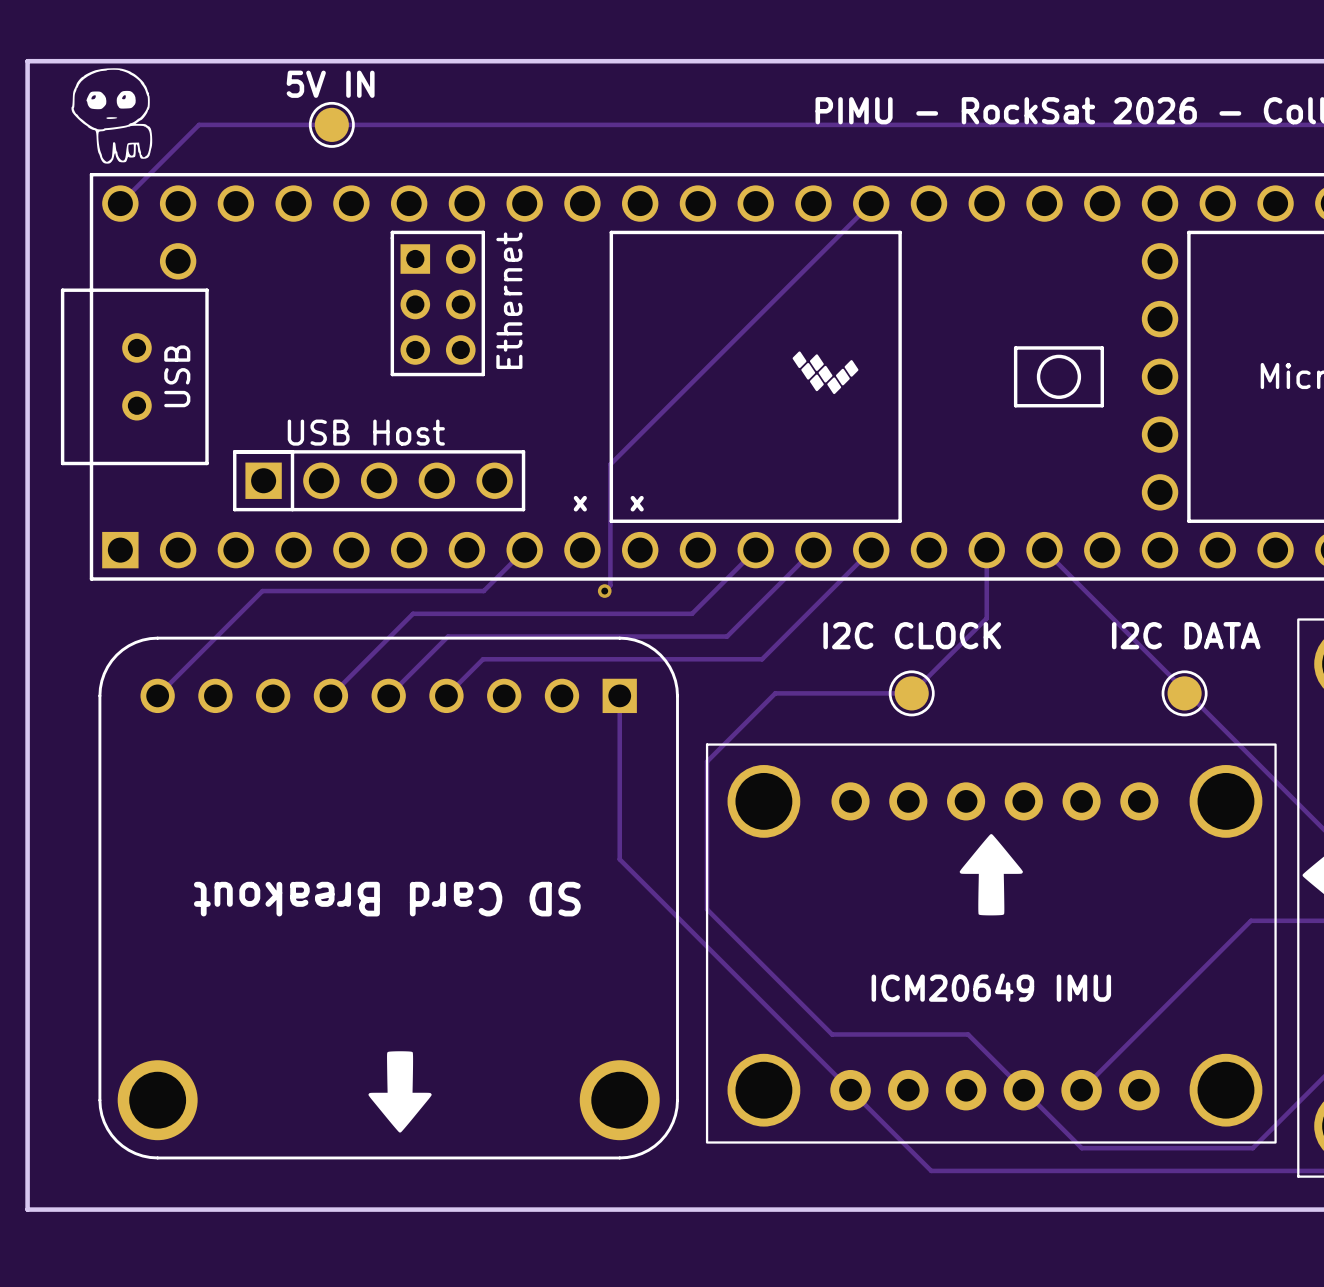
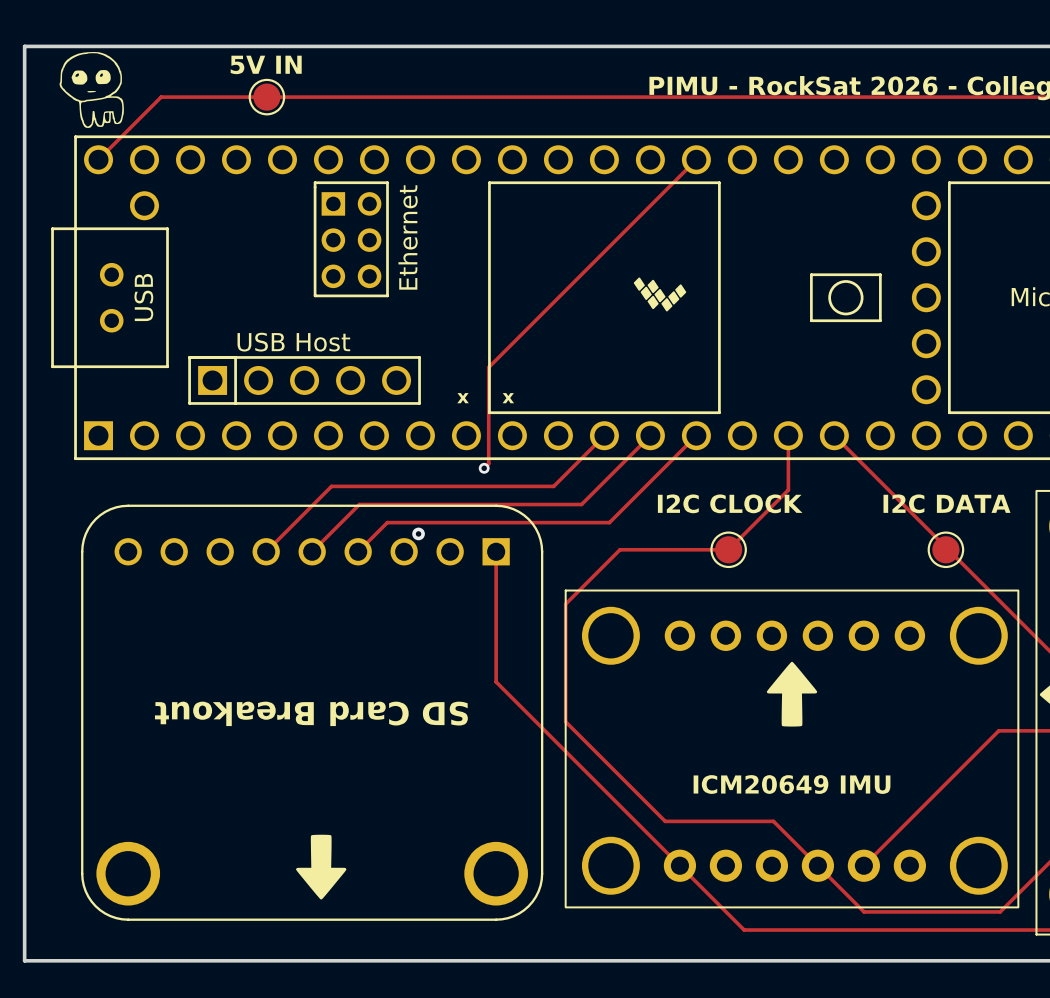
track: (524, 550) (483, 591) (262, 591) (157, 695) -> none
via: none -> (418, 533)

